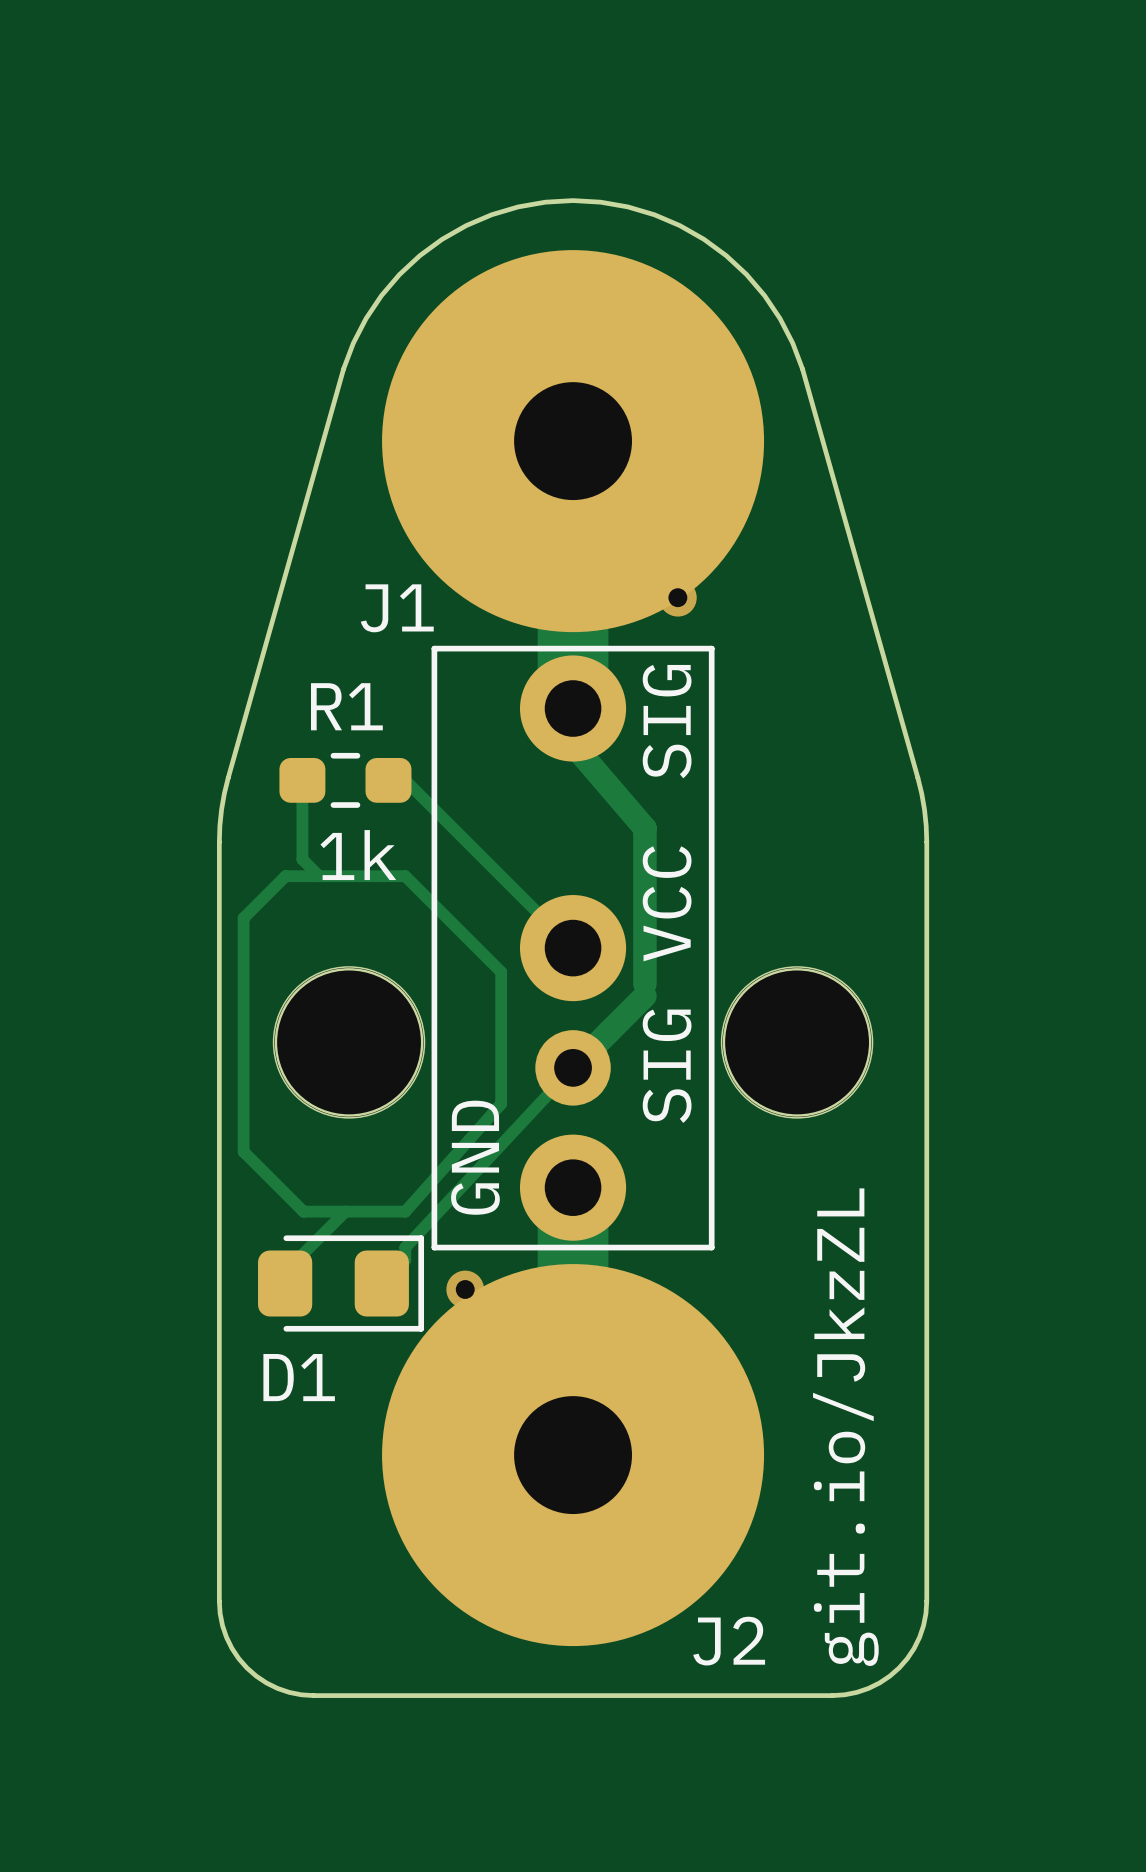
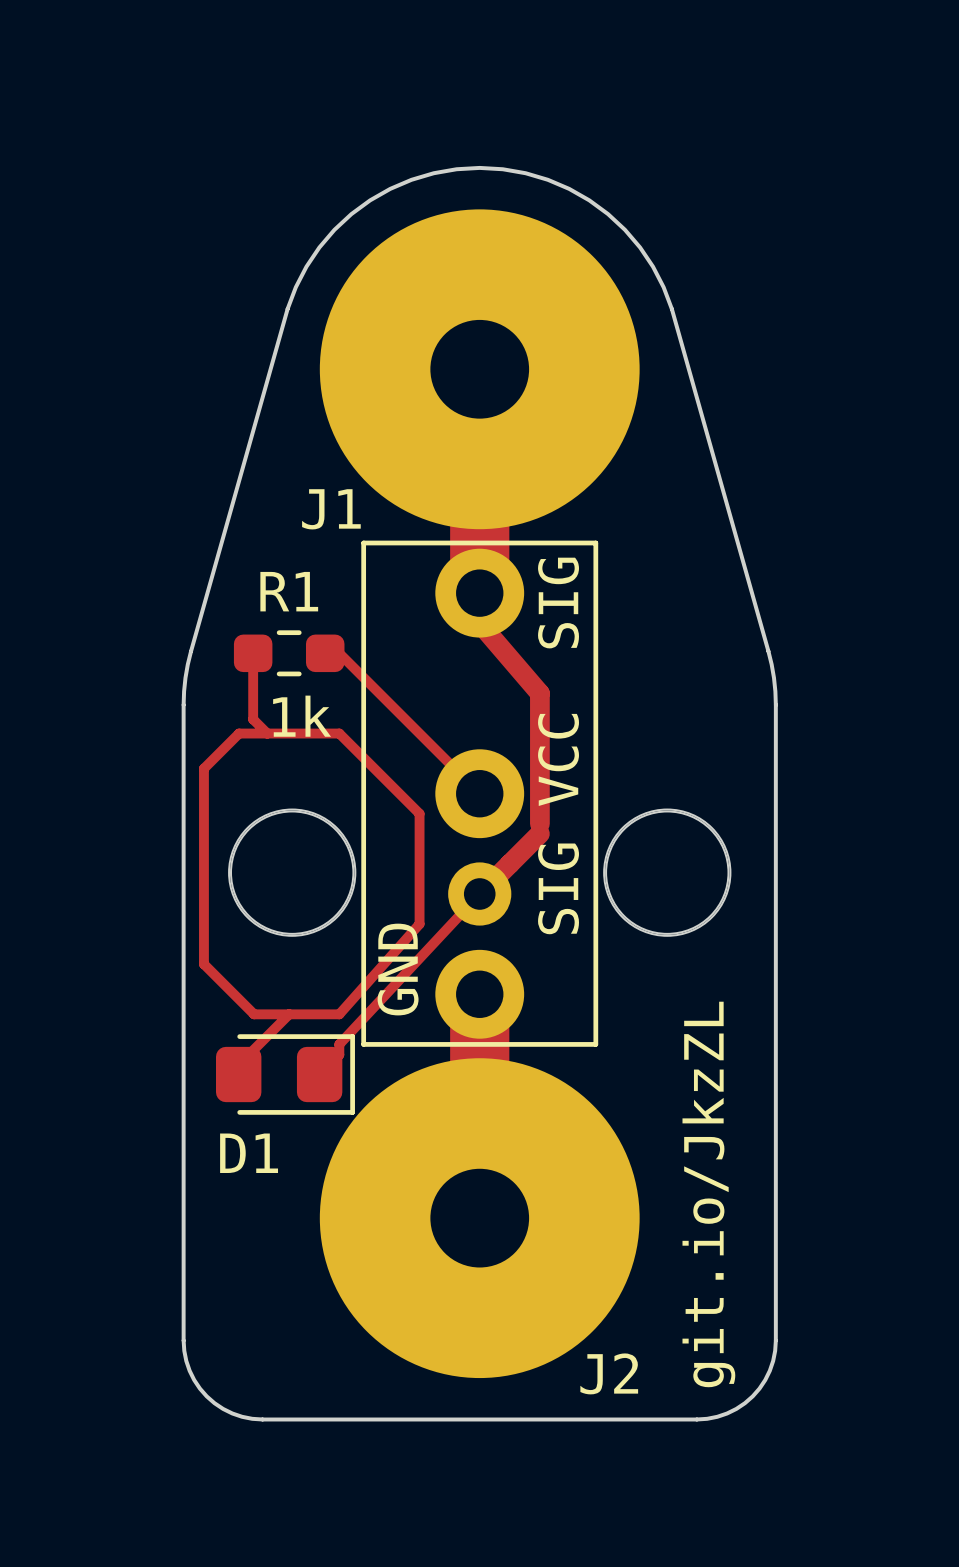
via: (677, 597) -> none
via: (465, 1289) -> none

